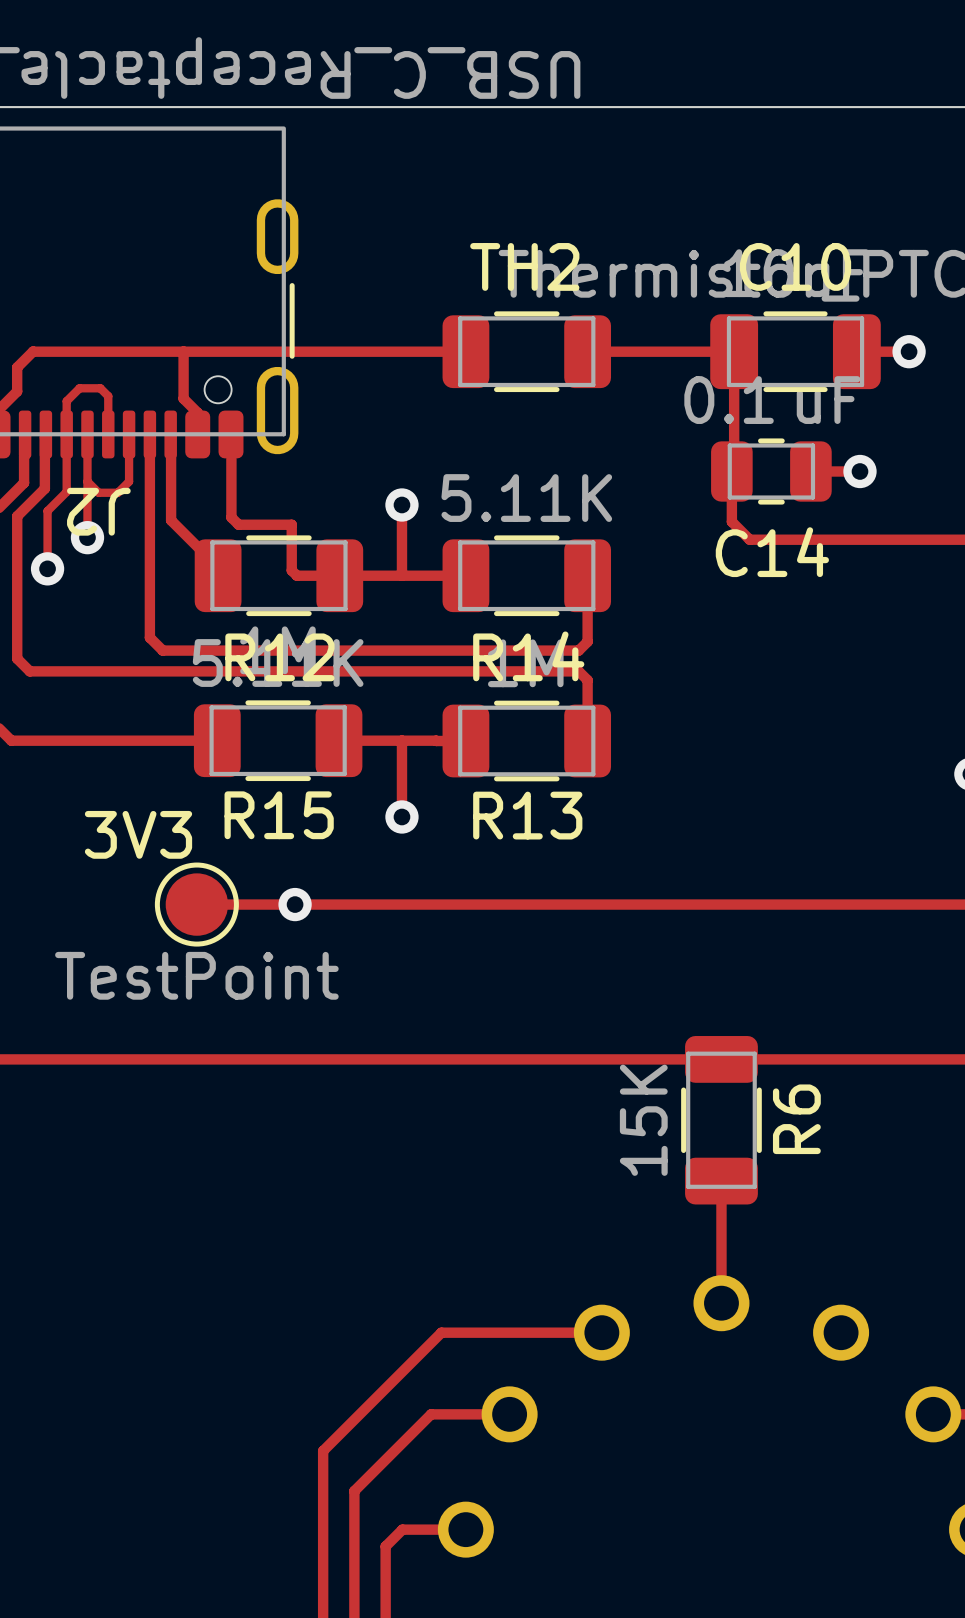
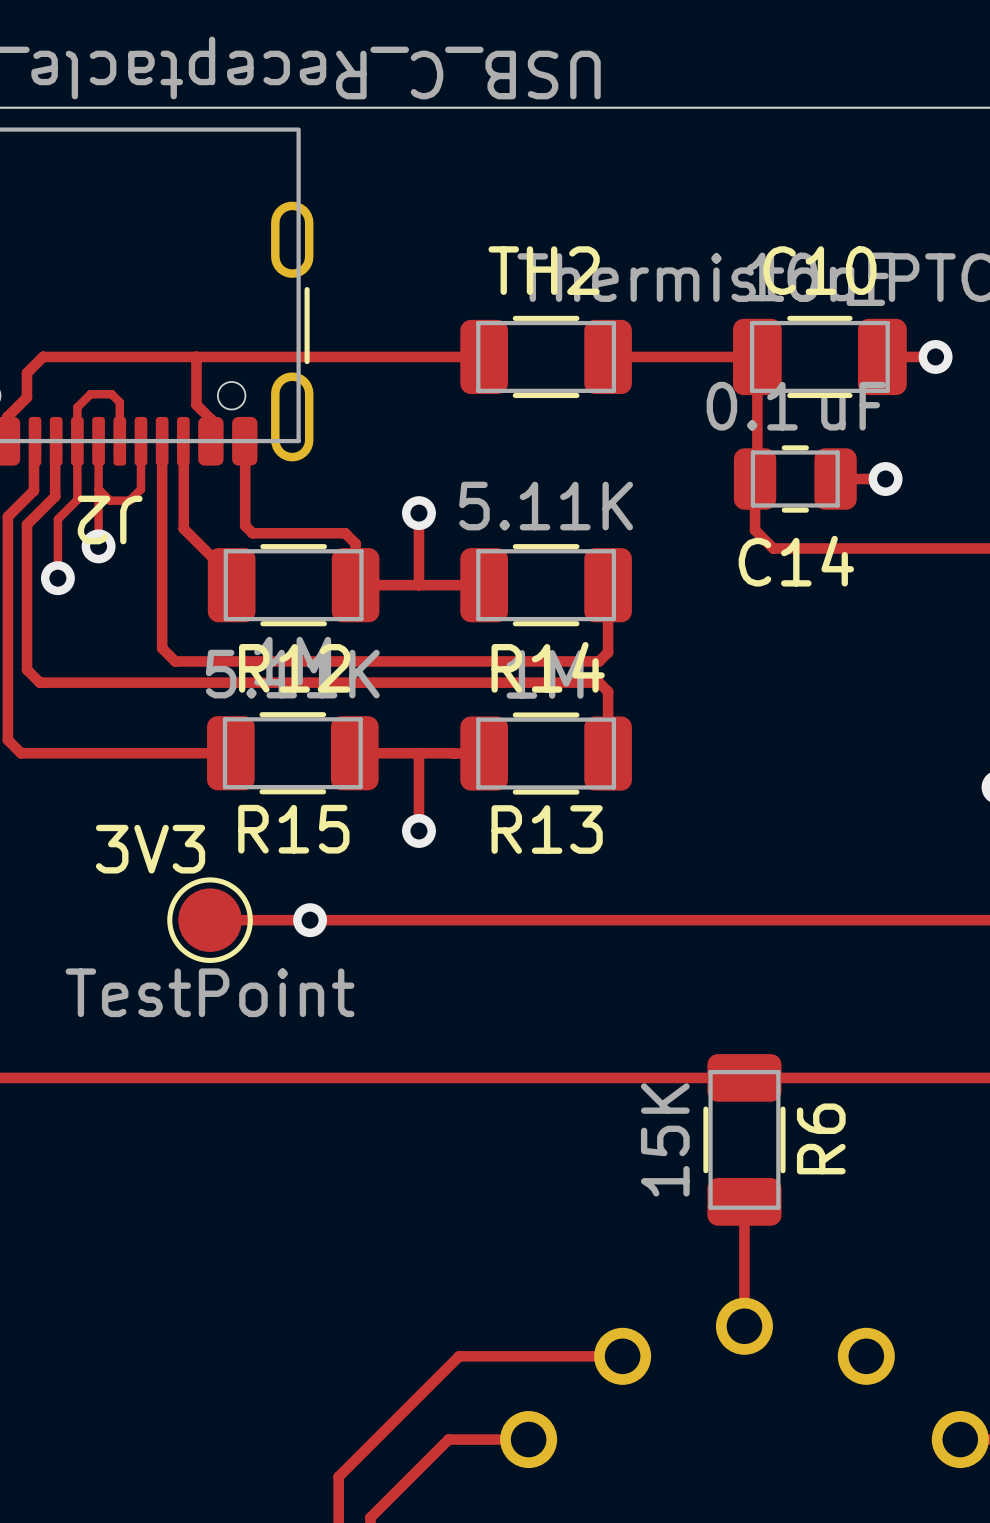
track: (291, 524) (291, 570) (296, 575) (339, 575) -> (306, 533) (345, 533) (355, 543) (355, 585)

